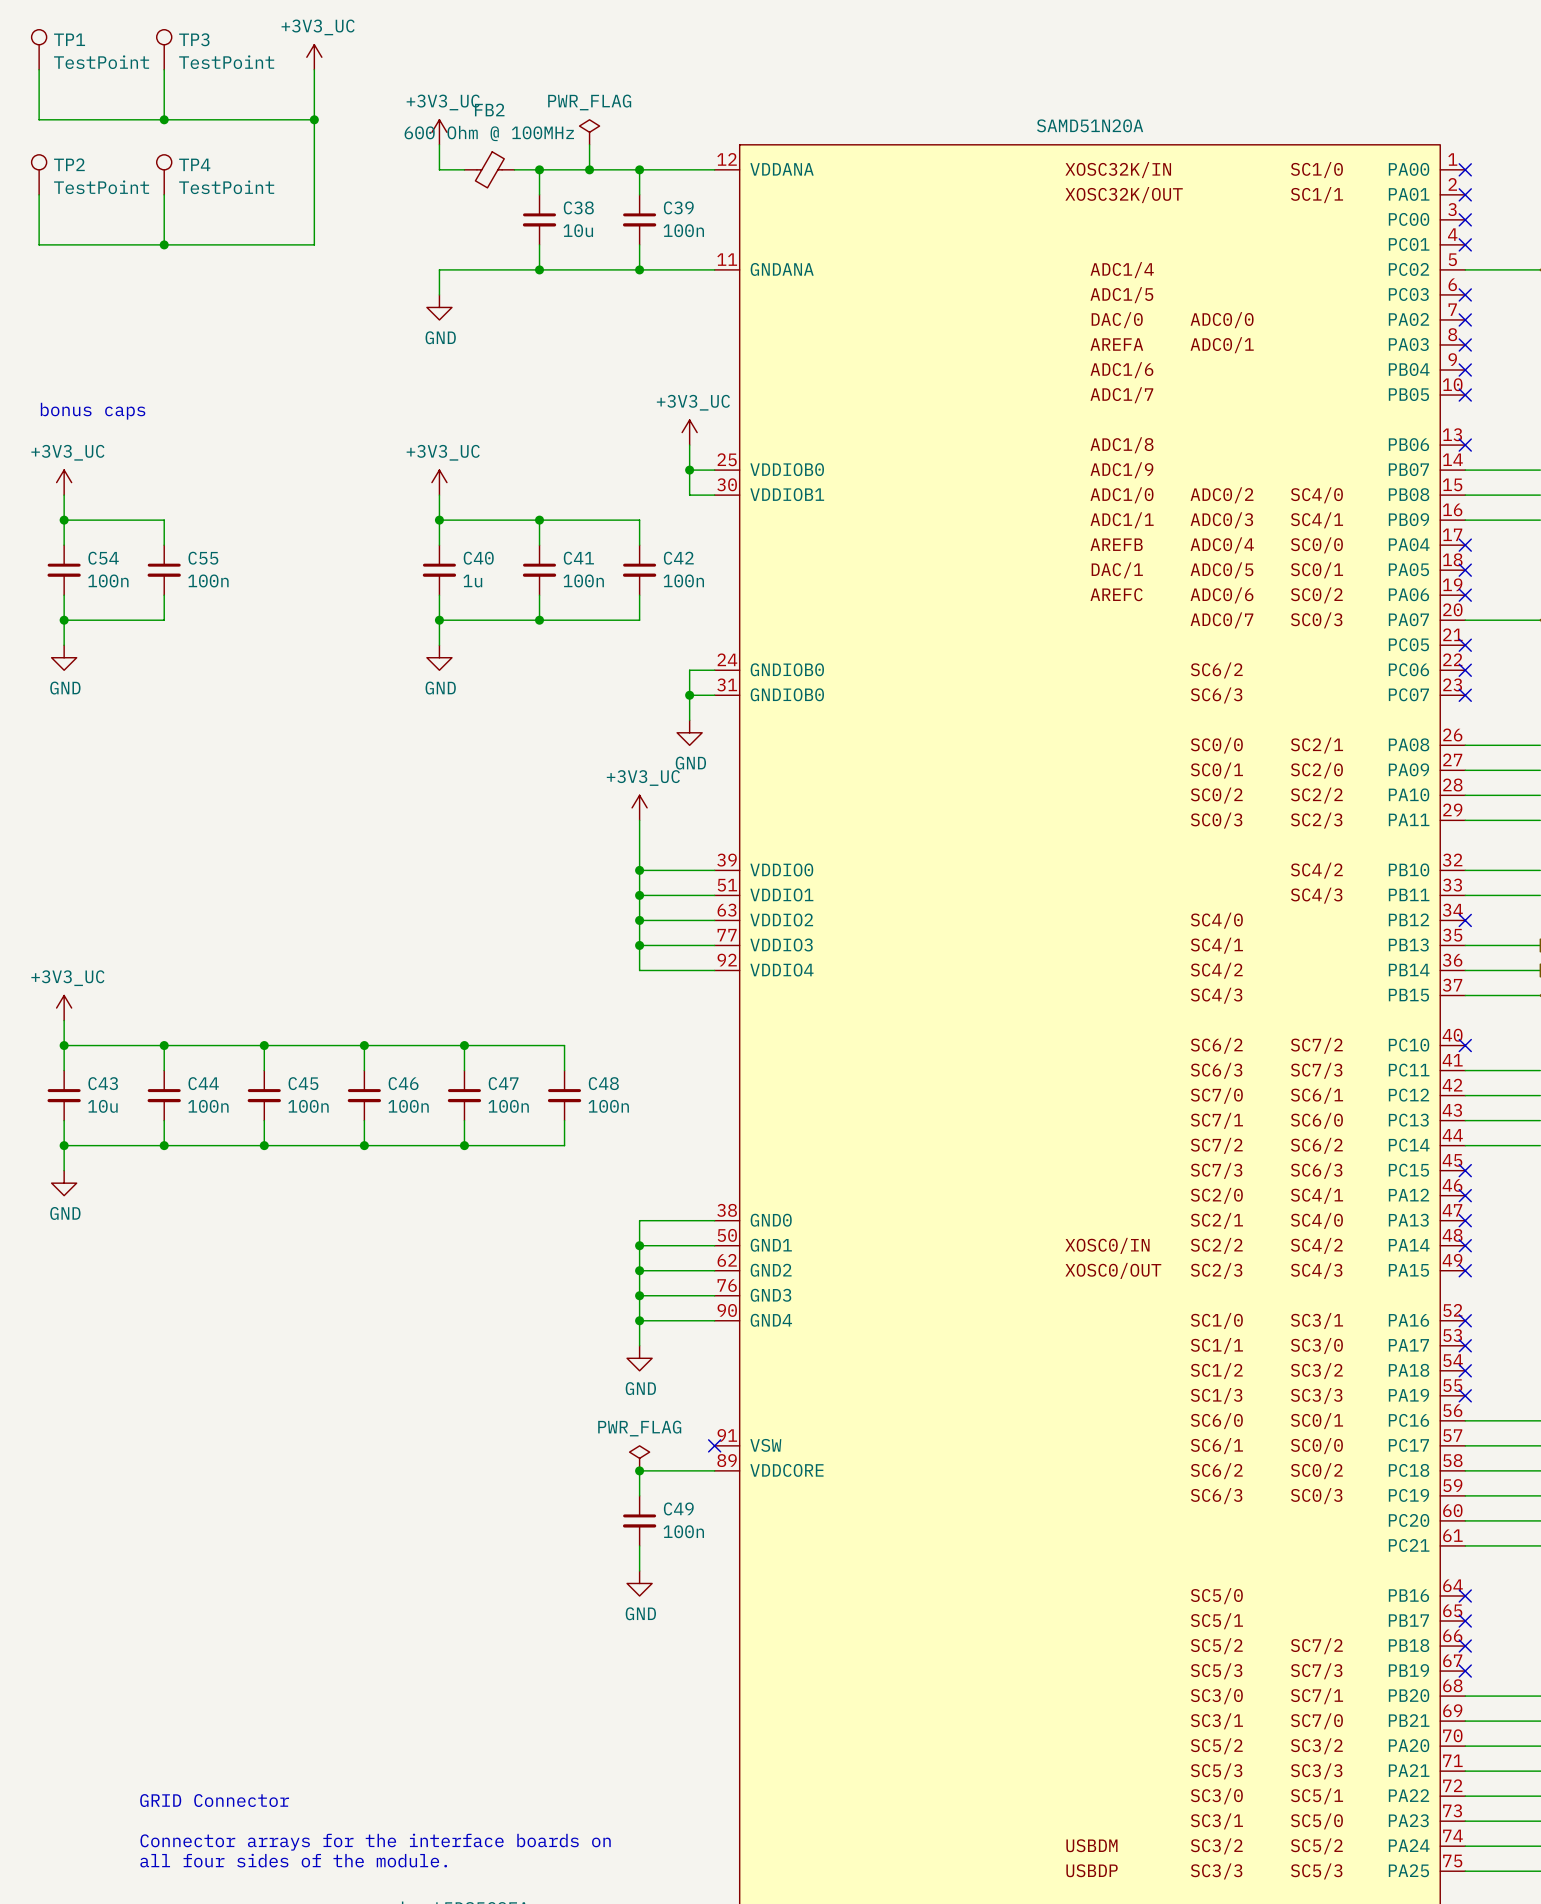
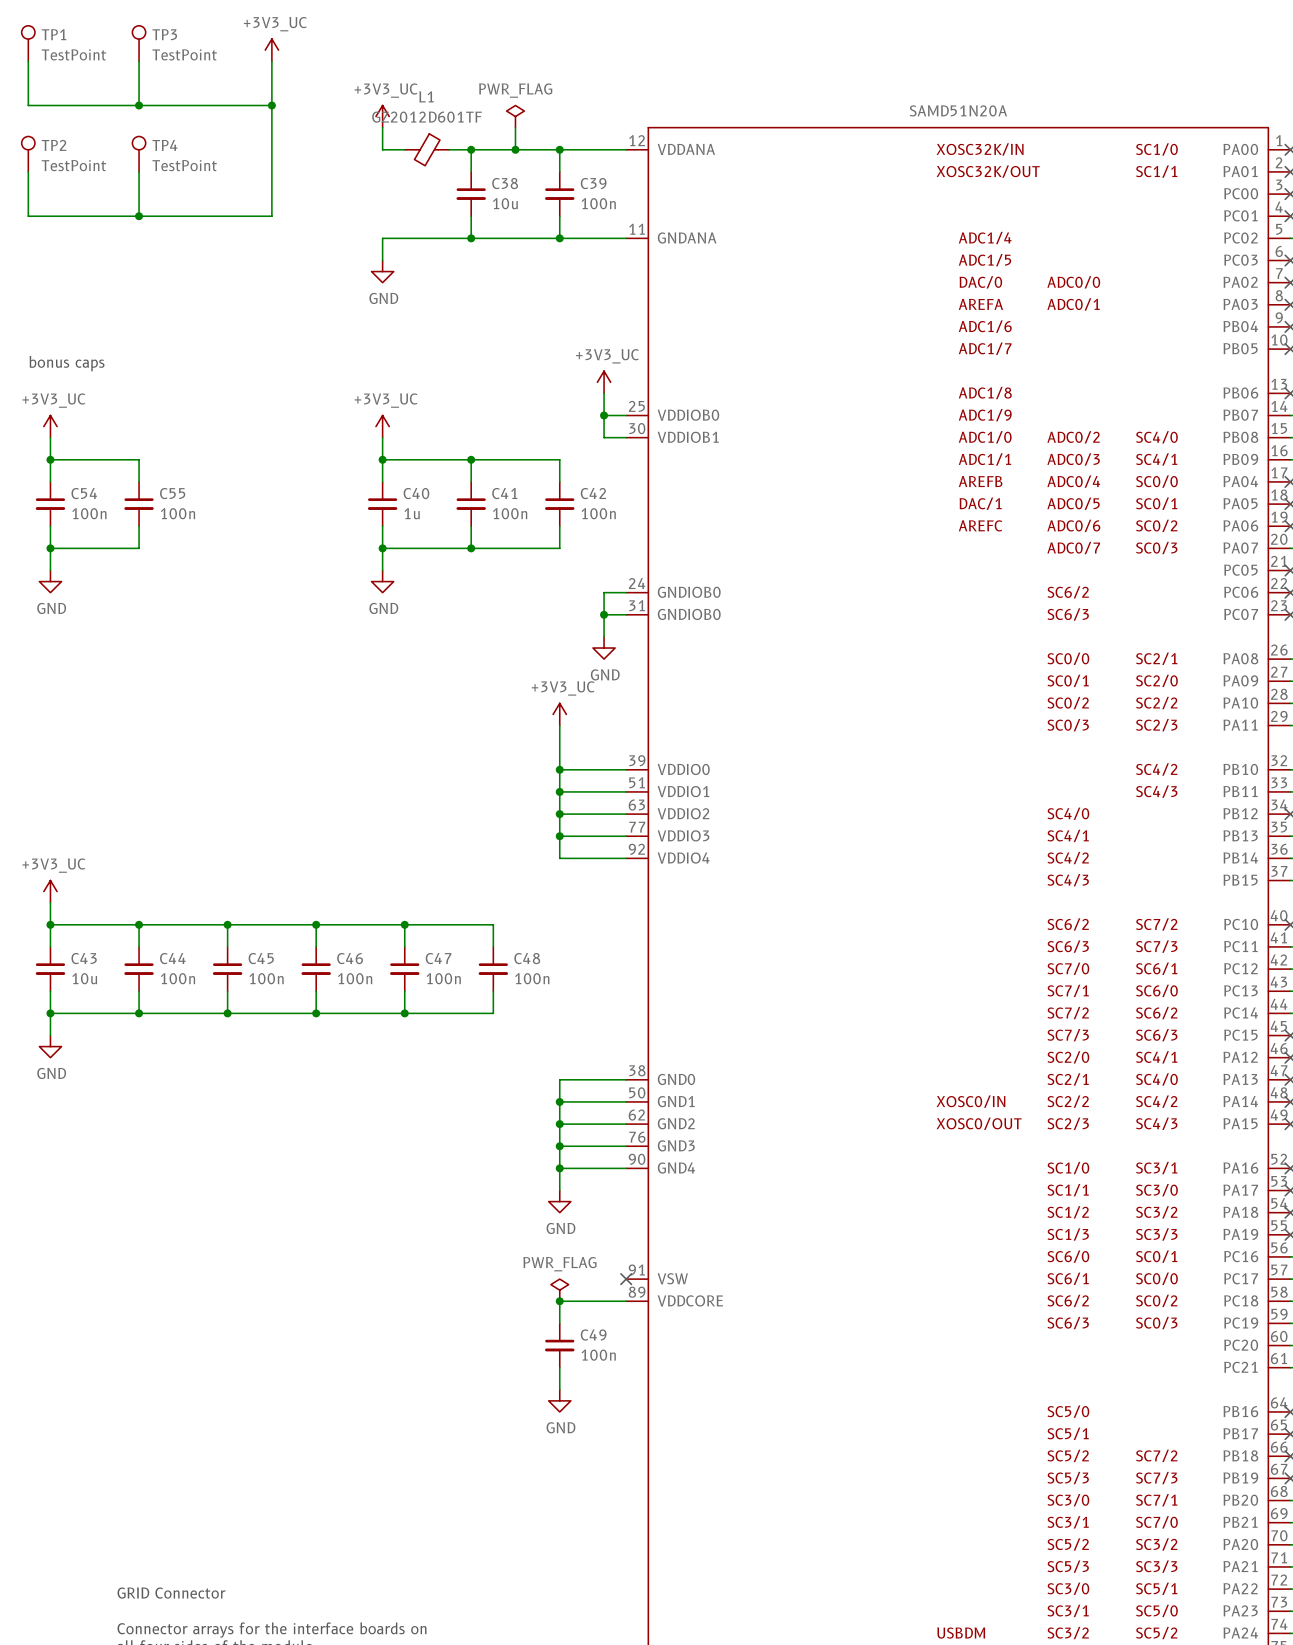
FB2 name: FB2 (489, 109) -> L1 (426, 96)
FB2 value: 600 Ohm @ 100MHz (489, 133) -> GZ2012D601TF (427, 117)

